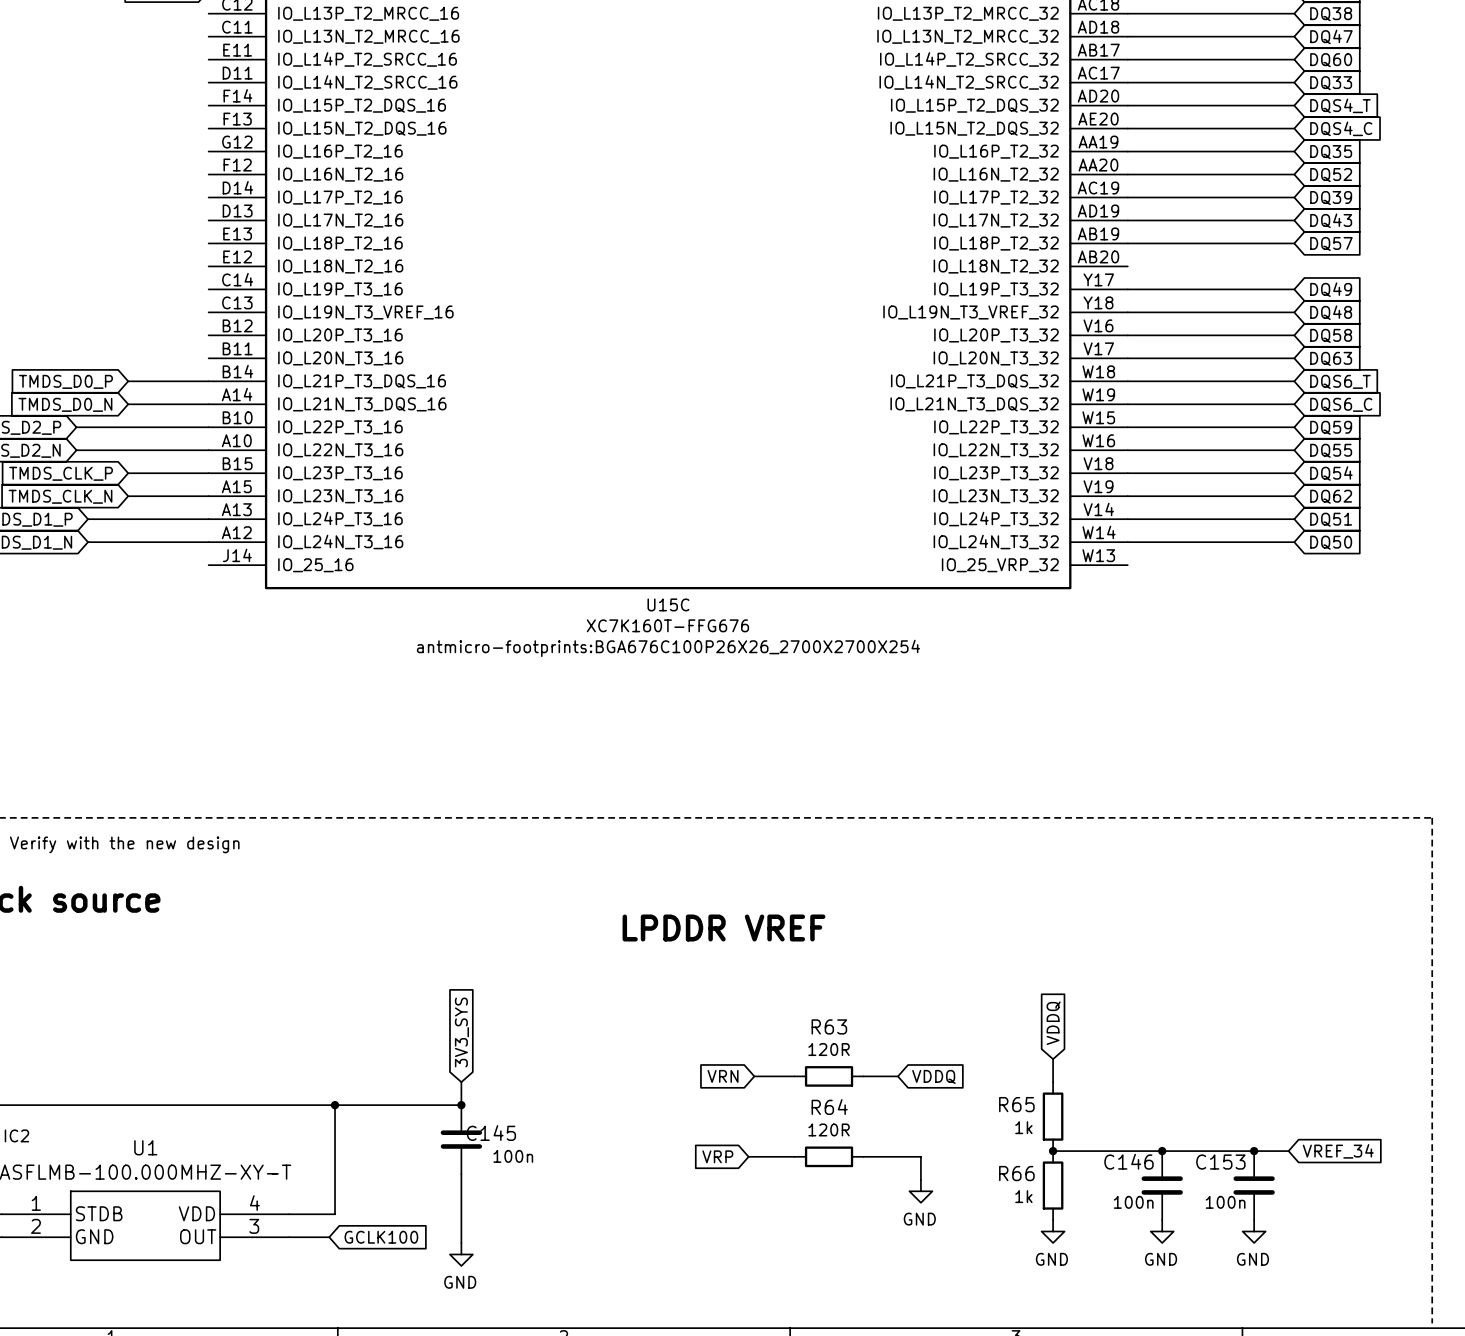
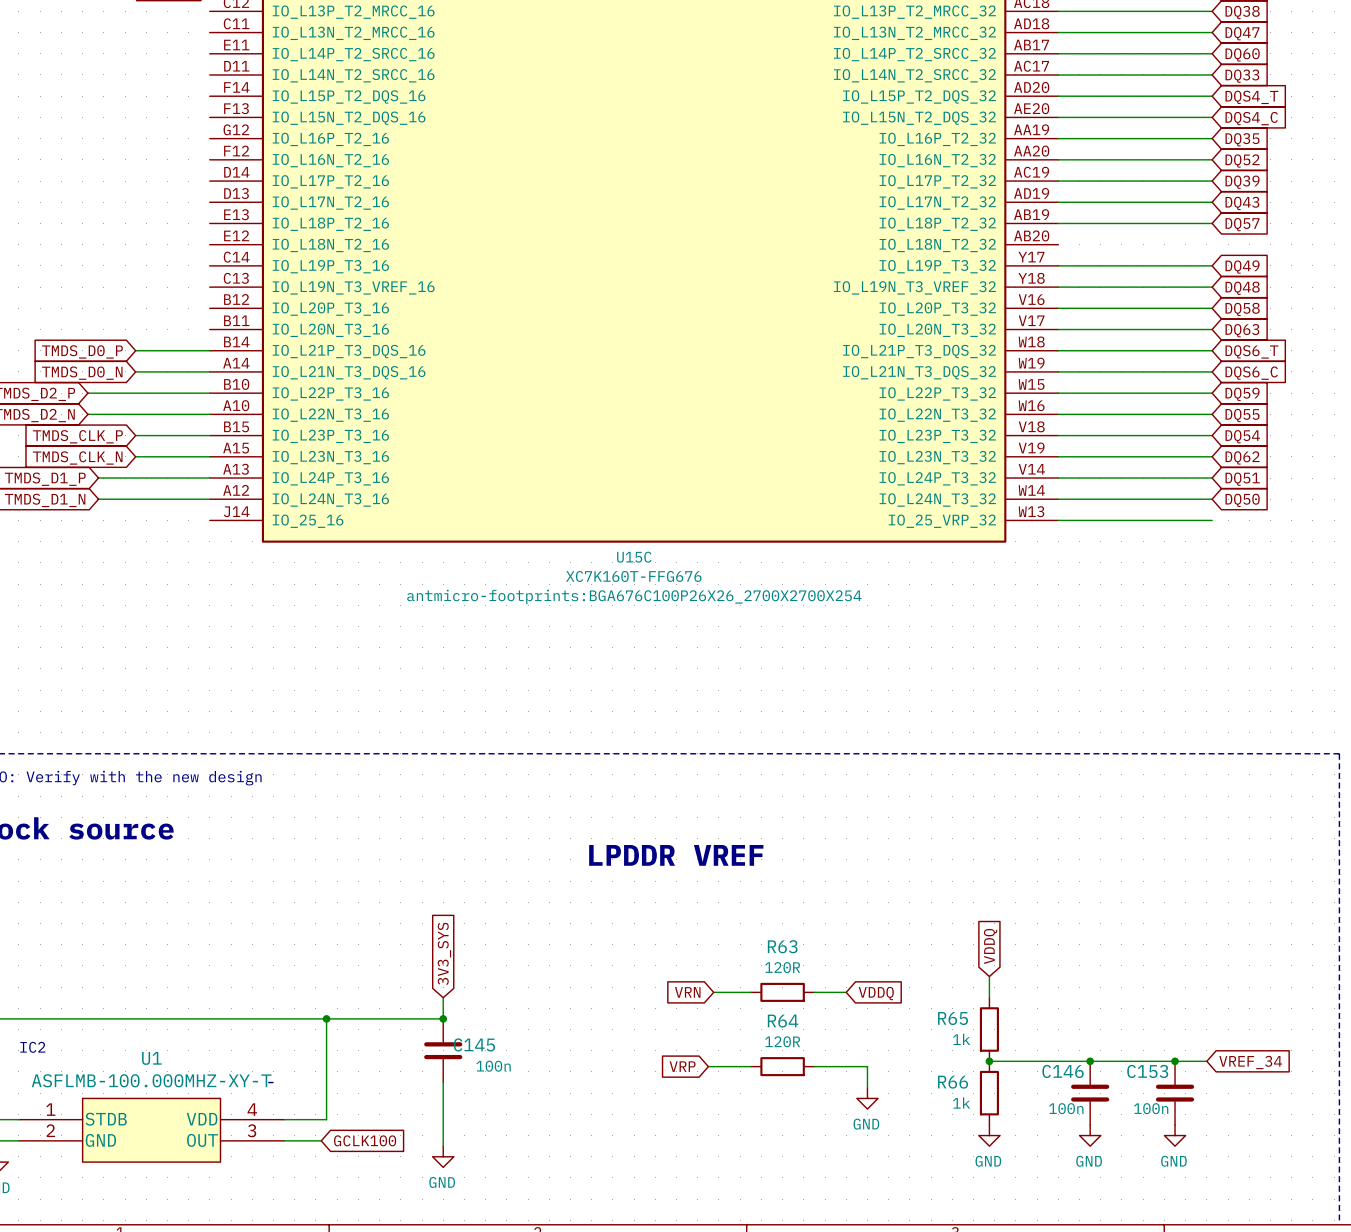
wire: none -> (1058, 520) (1212, 520)

